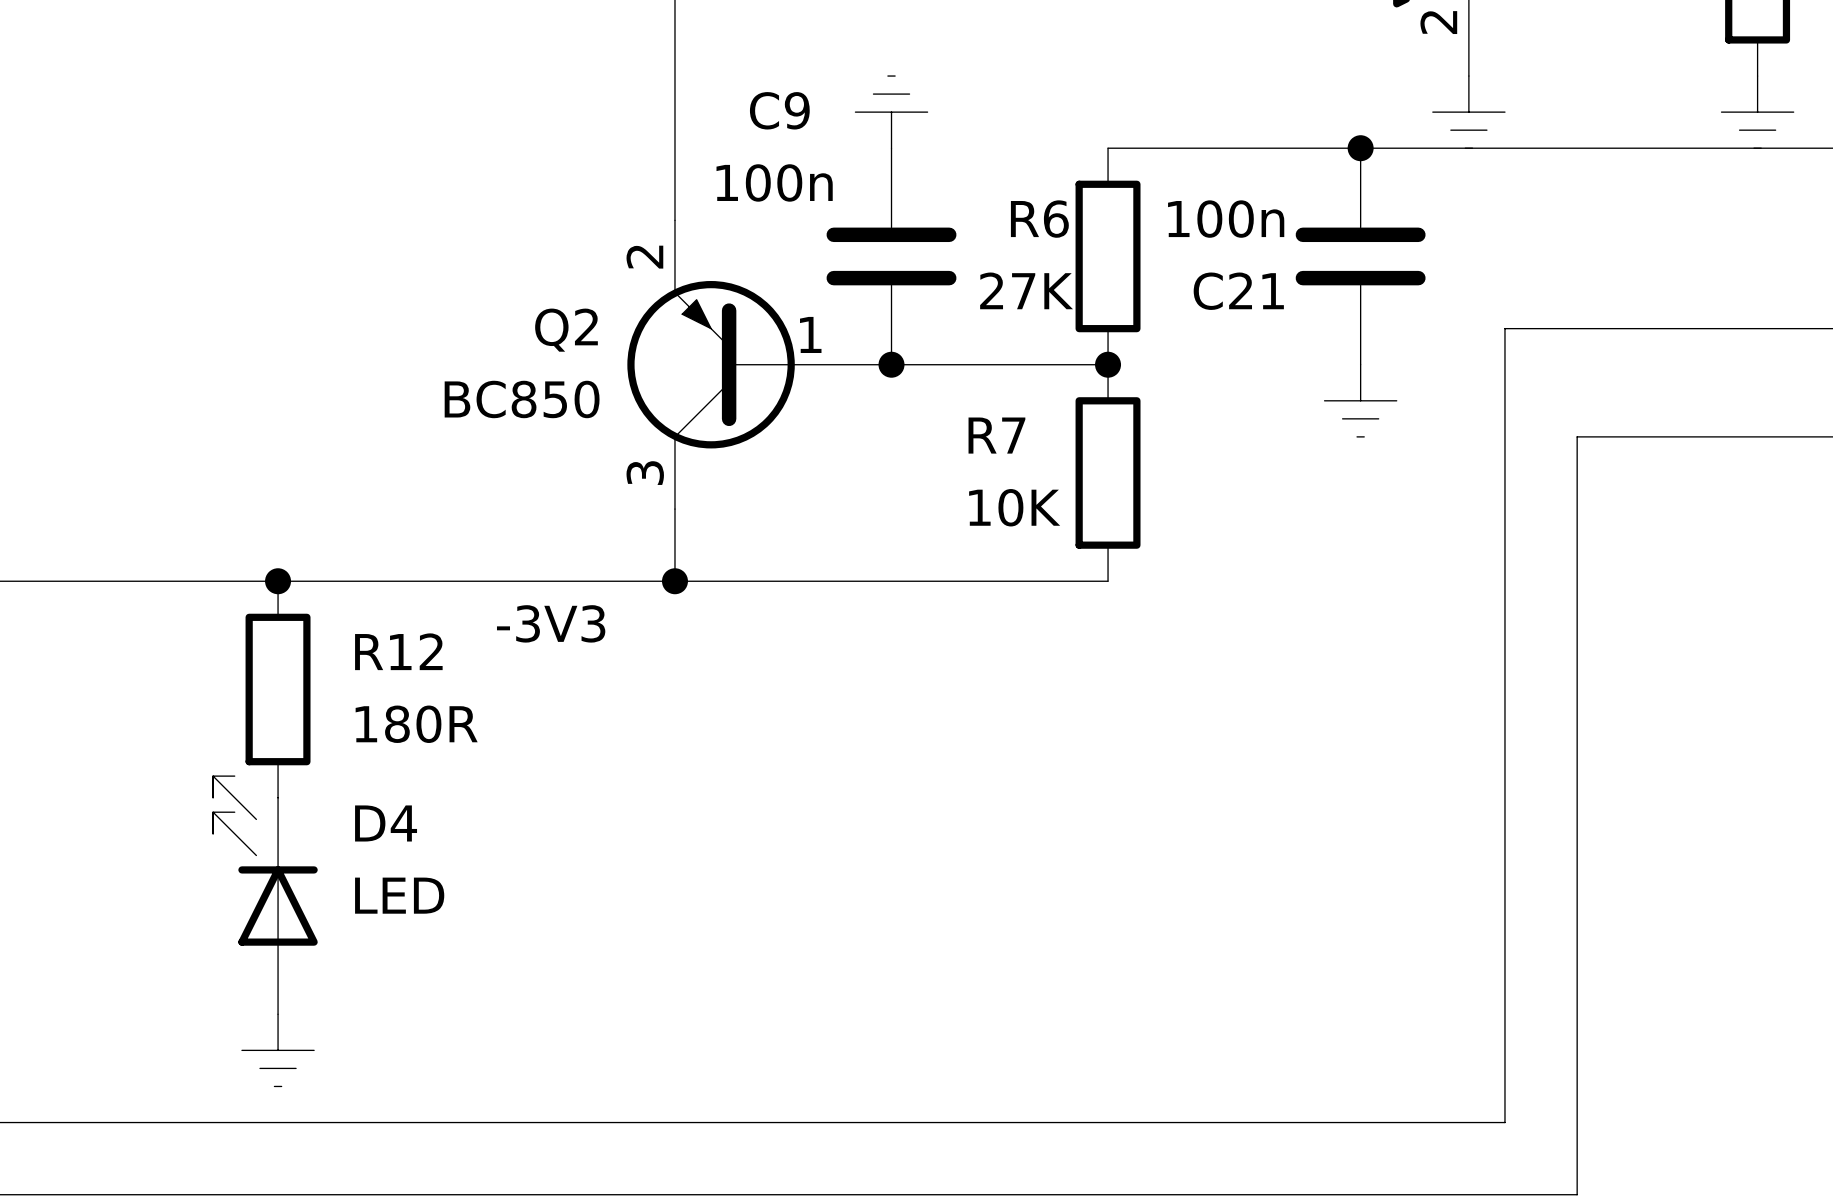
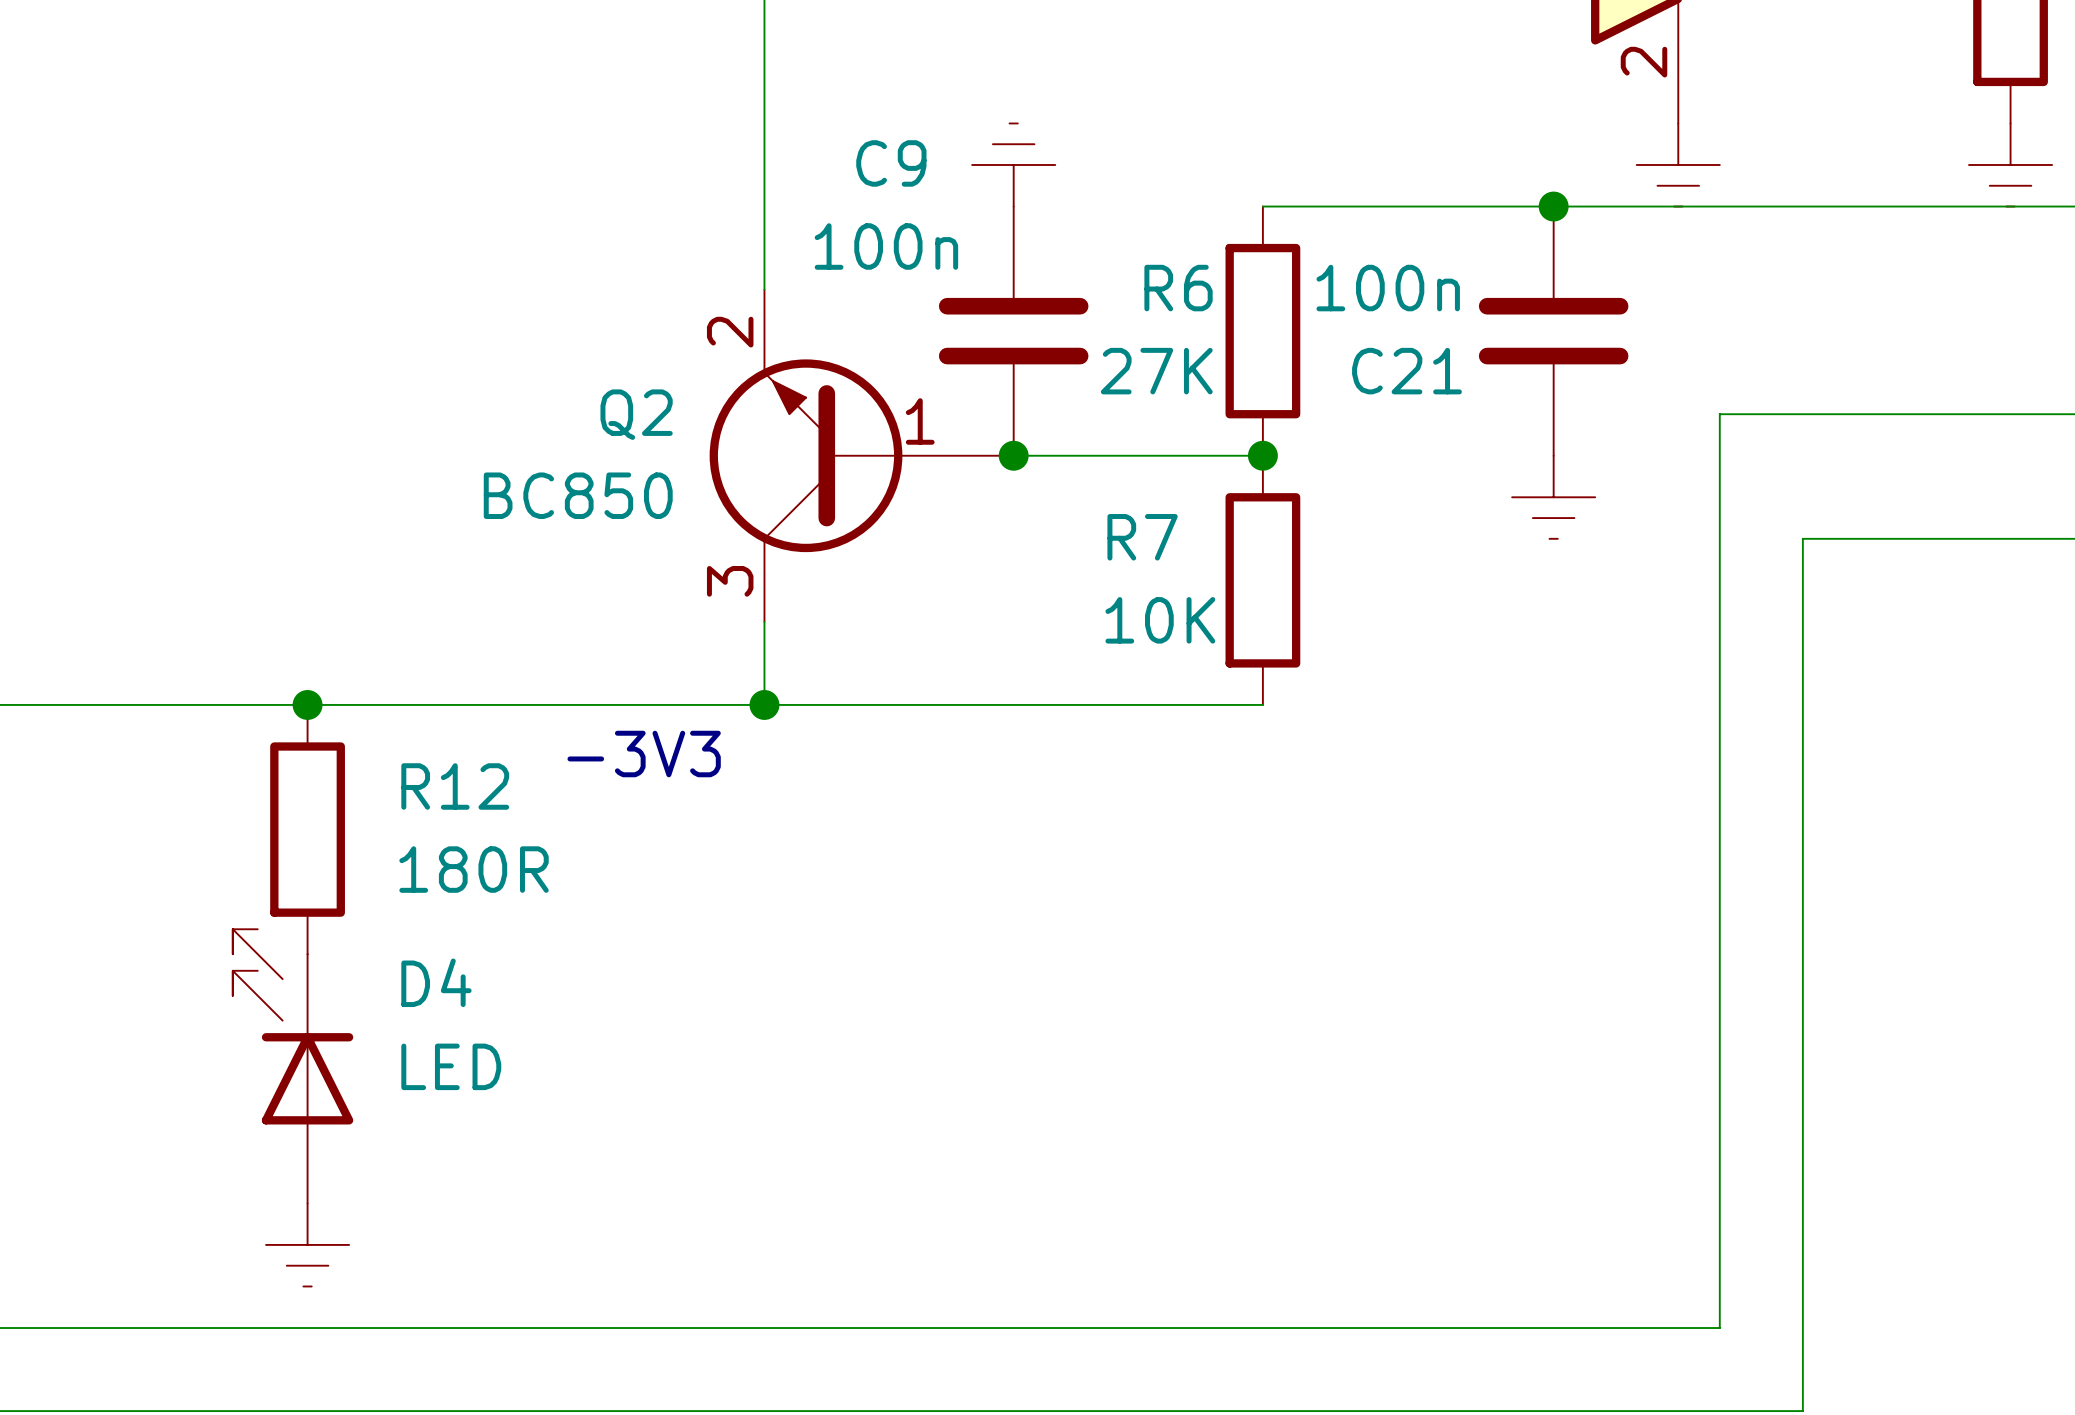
Q2 symbol: [627, 220, 892, 510] -> [709, 289, 1014, 622]

